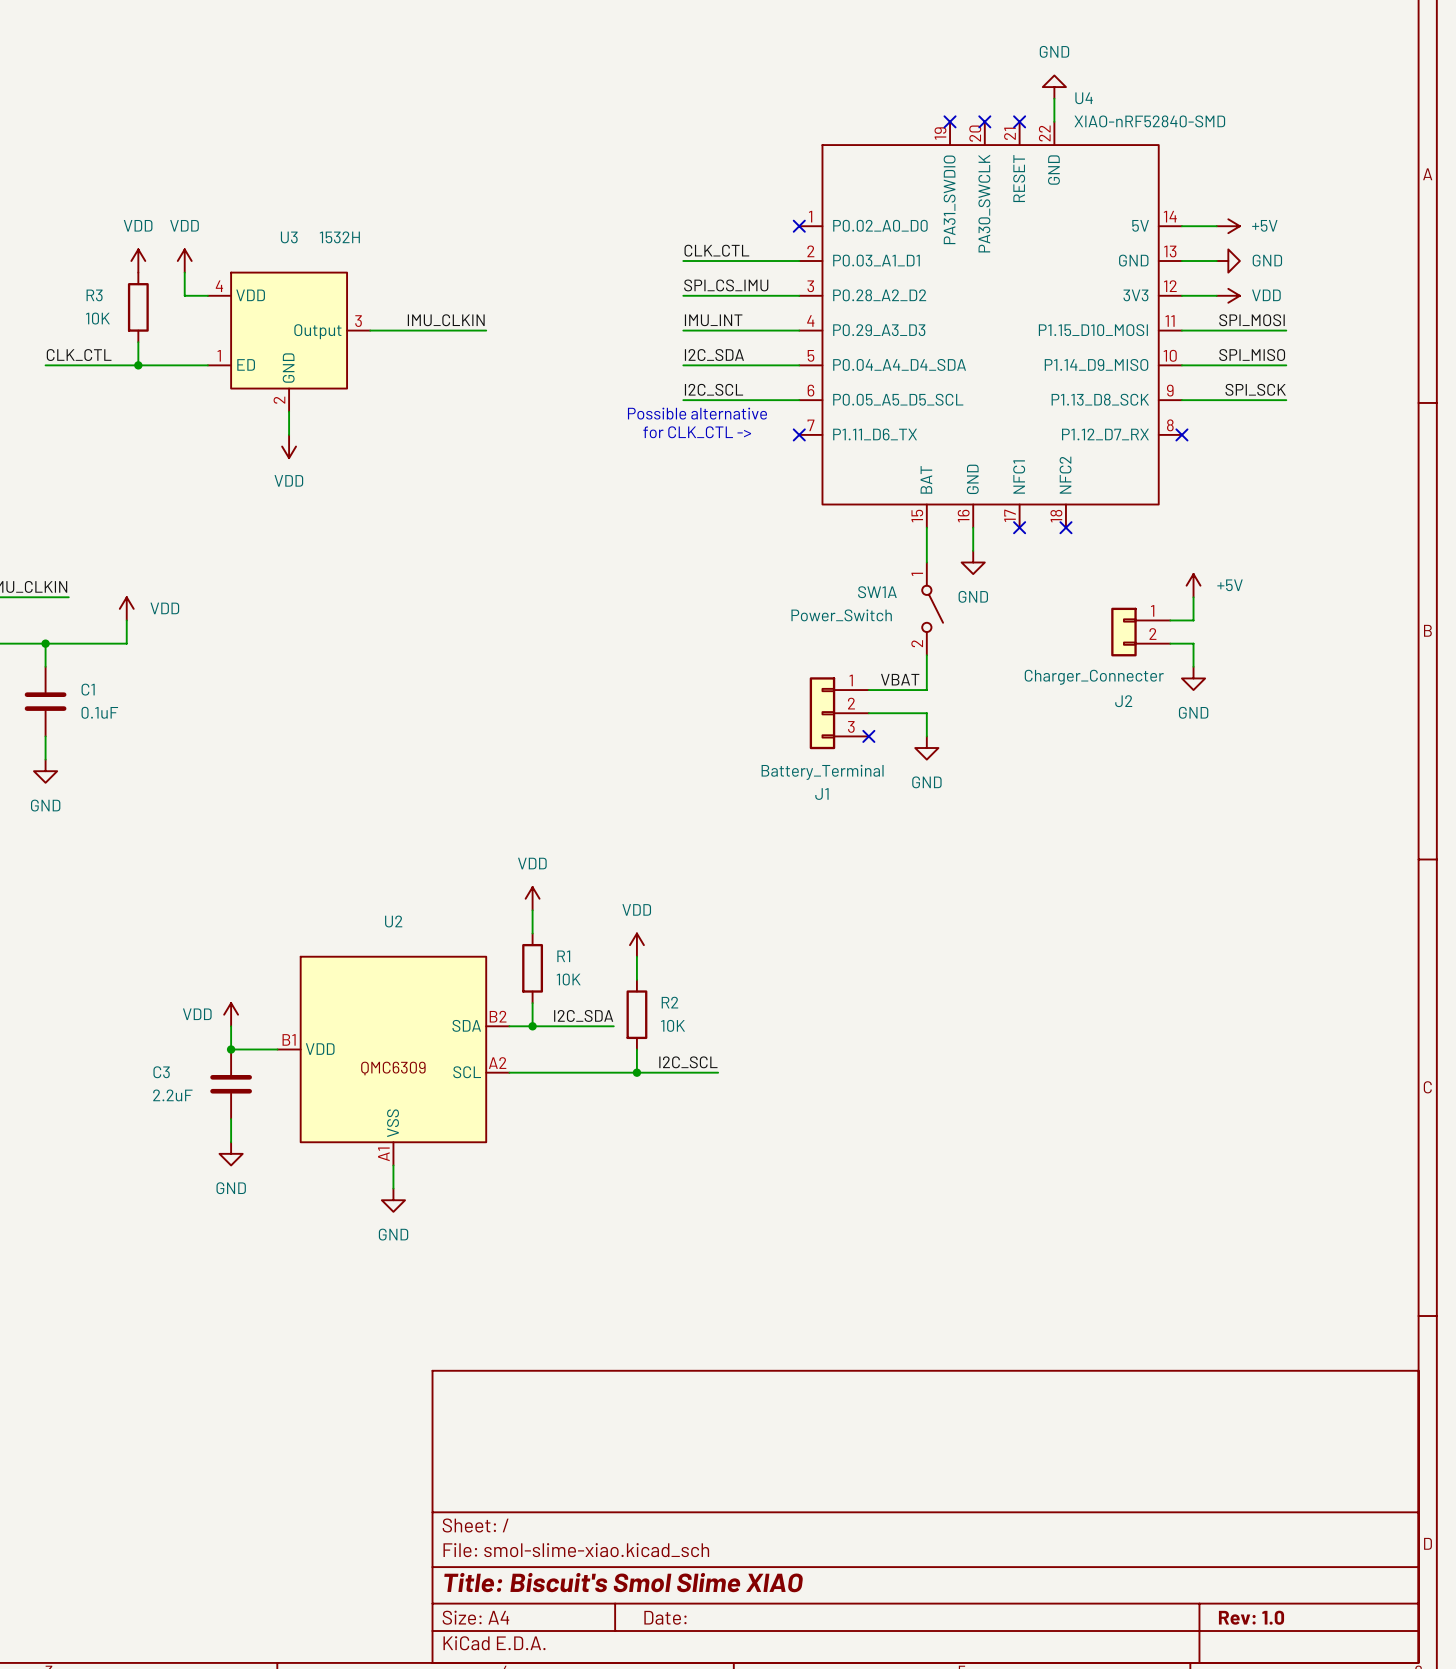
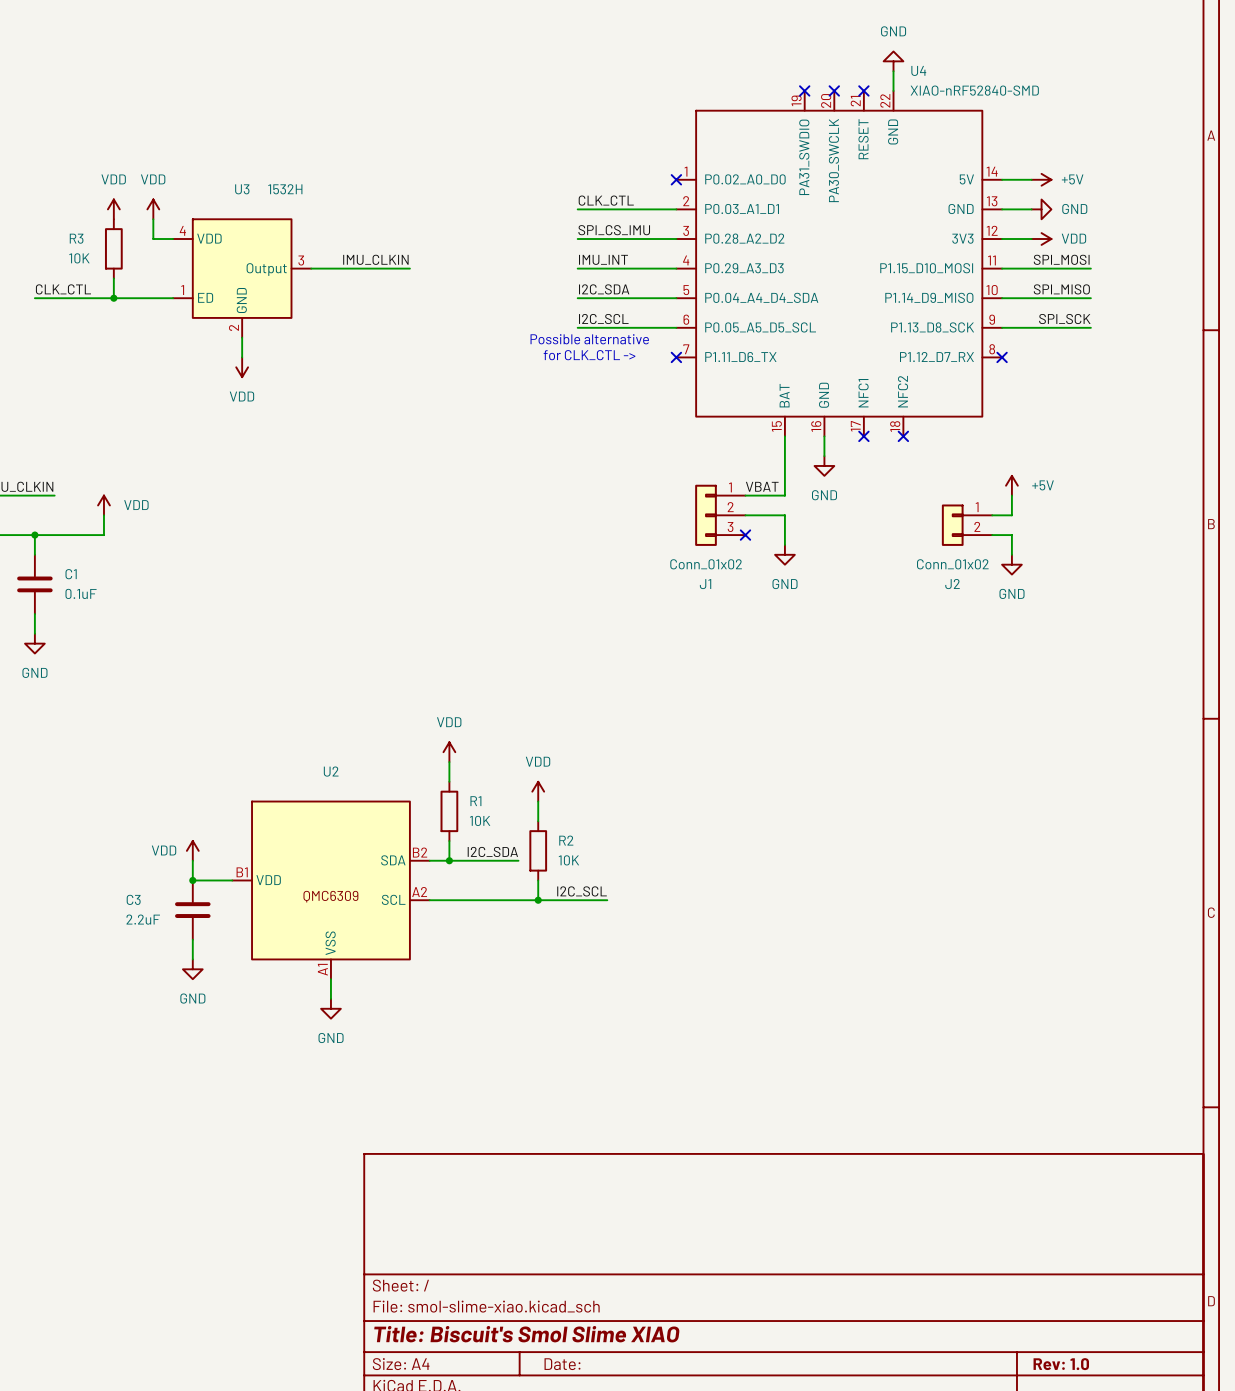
wire: none -> (784, 465) (784, 495) (745, 495)
SW1A: Power_Switch (932, 608) -> none
no-connect mark: none -> (745, 535)
wire: (926, 655) (926, 690) (868, 690) -> (784, 544) (784, 515) (745, 515)
J2 value: Charger_Connecter (1094, 677) -> Conn_01x02 (952, 564)
label position: VBAT (900, 679) -> VBAT (762, 486)
J1 position: (839, 713) -> (720, 515)
wire: (868, 713) (926, 713) (926, 736) -> none
no-connect mark: (868, 736) -> none
power symbol position: GND (926, 748) -> GND (784, 554)
J1 value: Battery_Terminal (822, 772) -> Conn_01x02 (706, 564)

